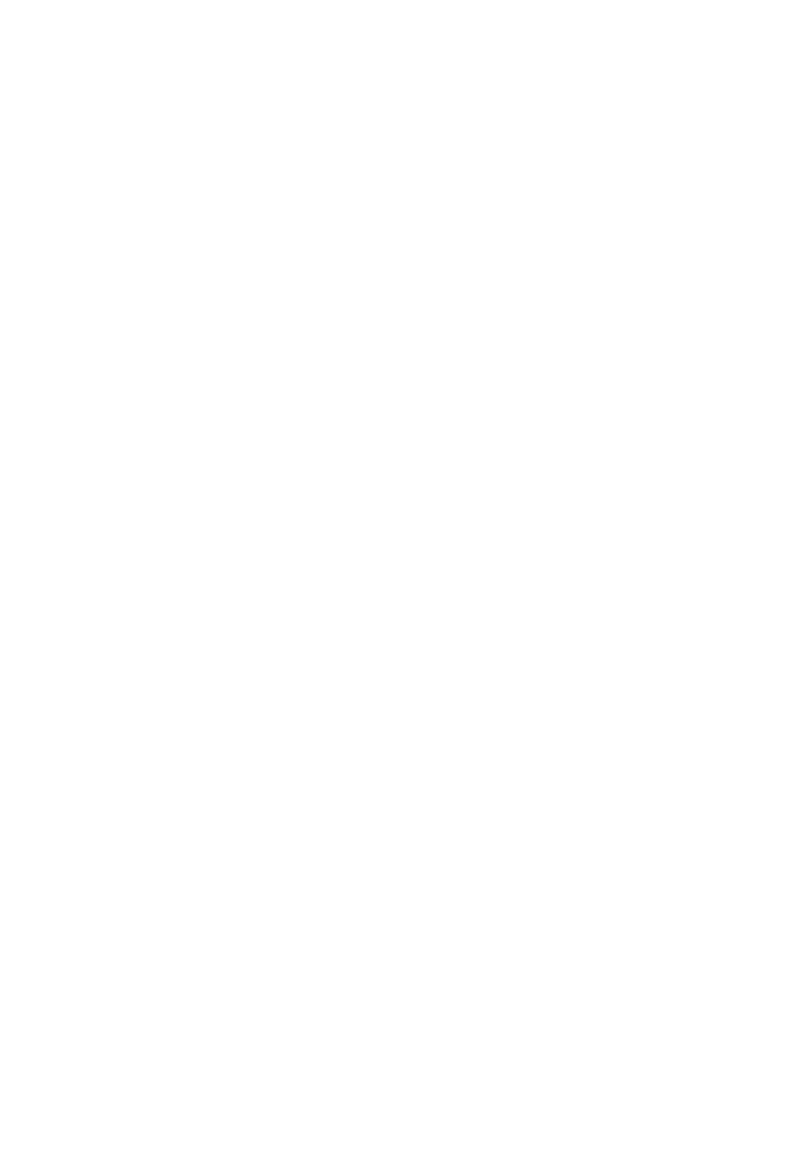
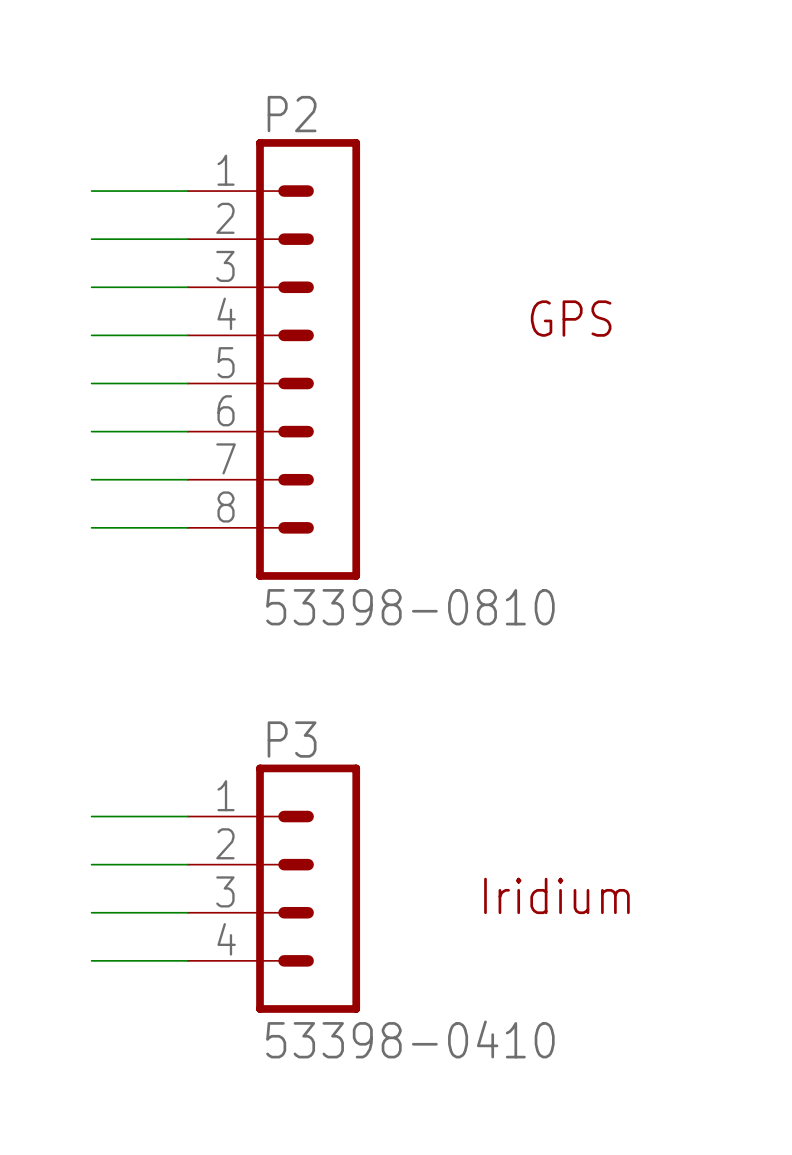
wire: none -> (91, 191) (187, 191)
wire: none -> (91, 239) (187, 239)
wire: none -> (91, 287) (187, 287)
text: none -> GPS (571, 318)
wire: none -> (91, 335) (187, 335)
P2: none -> 53398-0810 (273, 359)
wire: none -> (91, 383) (187, 383)
wire: none -> (91, 431) (187, 431)
wire: none -> (91, 479) (187, 479)
wire: none -> (91, 527) (187, 527)
wire: none -> (91, 816) (187, 816)
wire: none -> (91, 864) (187, 864)
P3: none -> 53398-0410 (273, 888)
text: none -> Iridium (556, 895)
wire: none -> (91, 912) (187, 912)
wire: none -> (91, 960) (187, 960)

